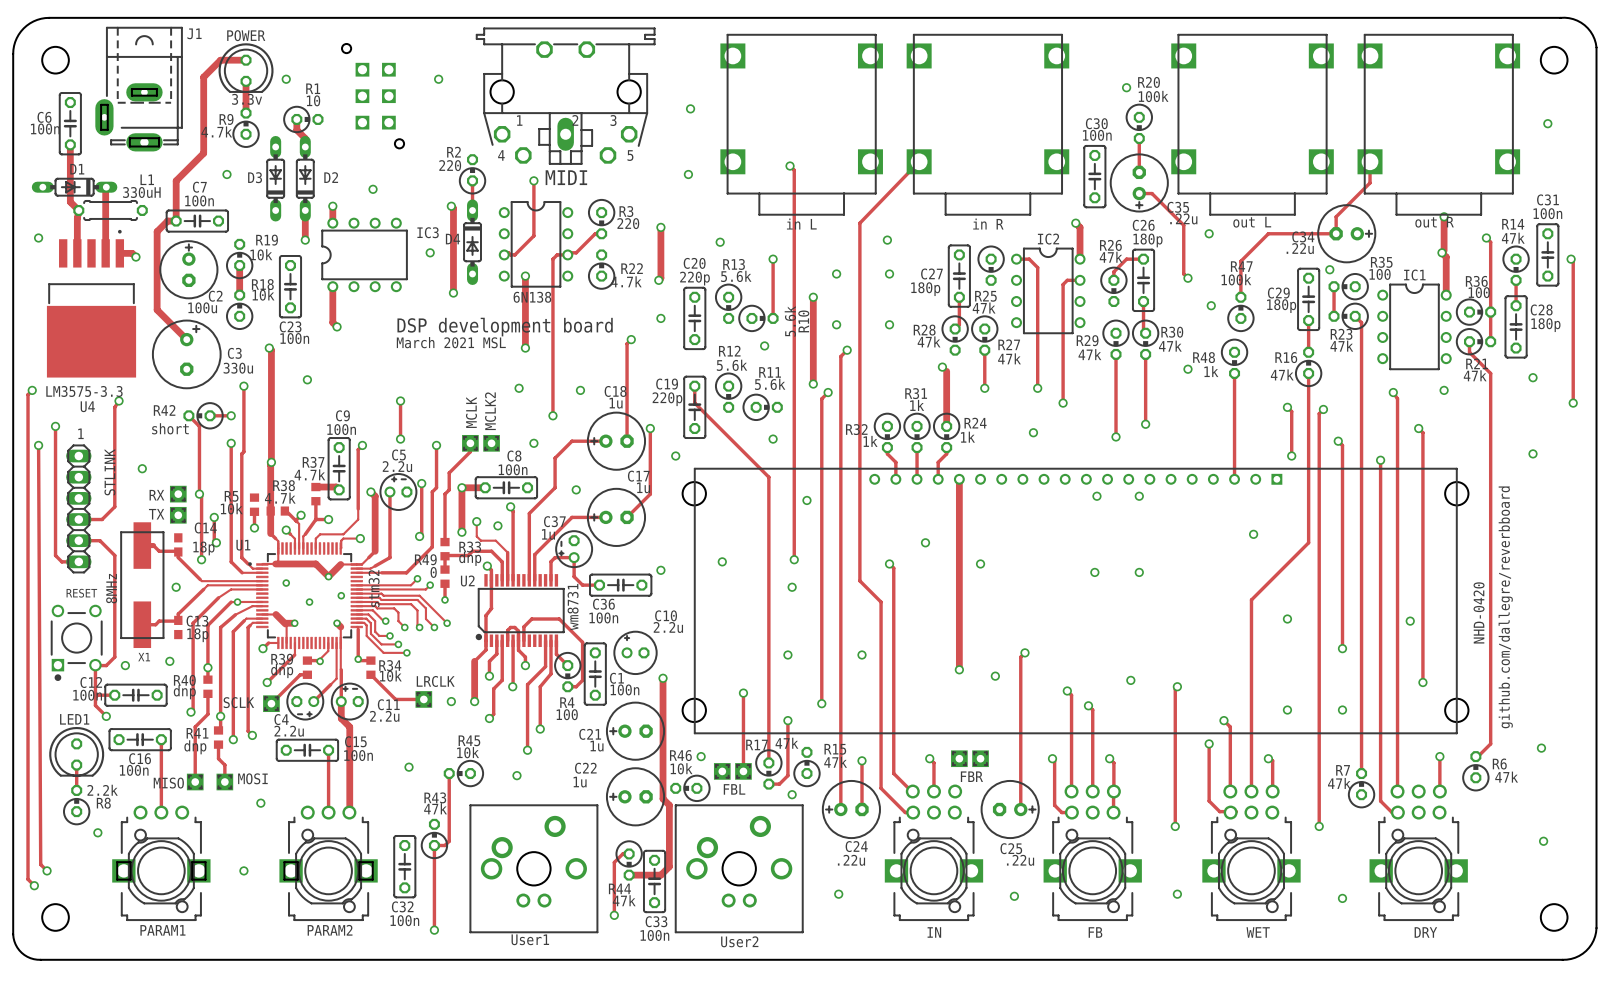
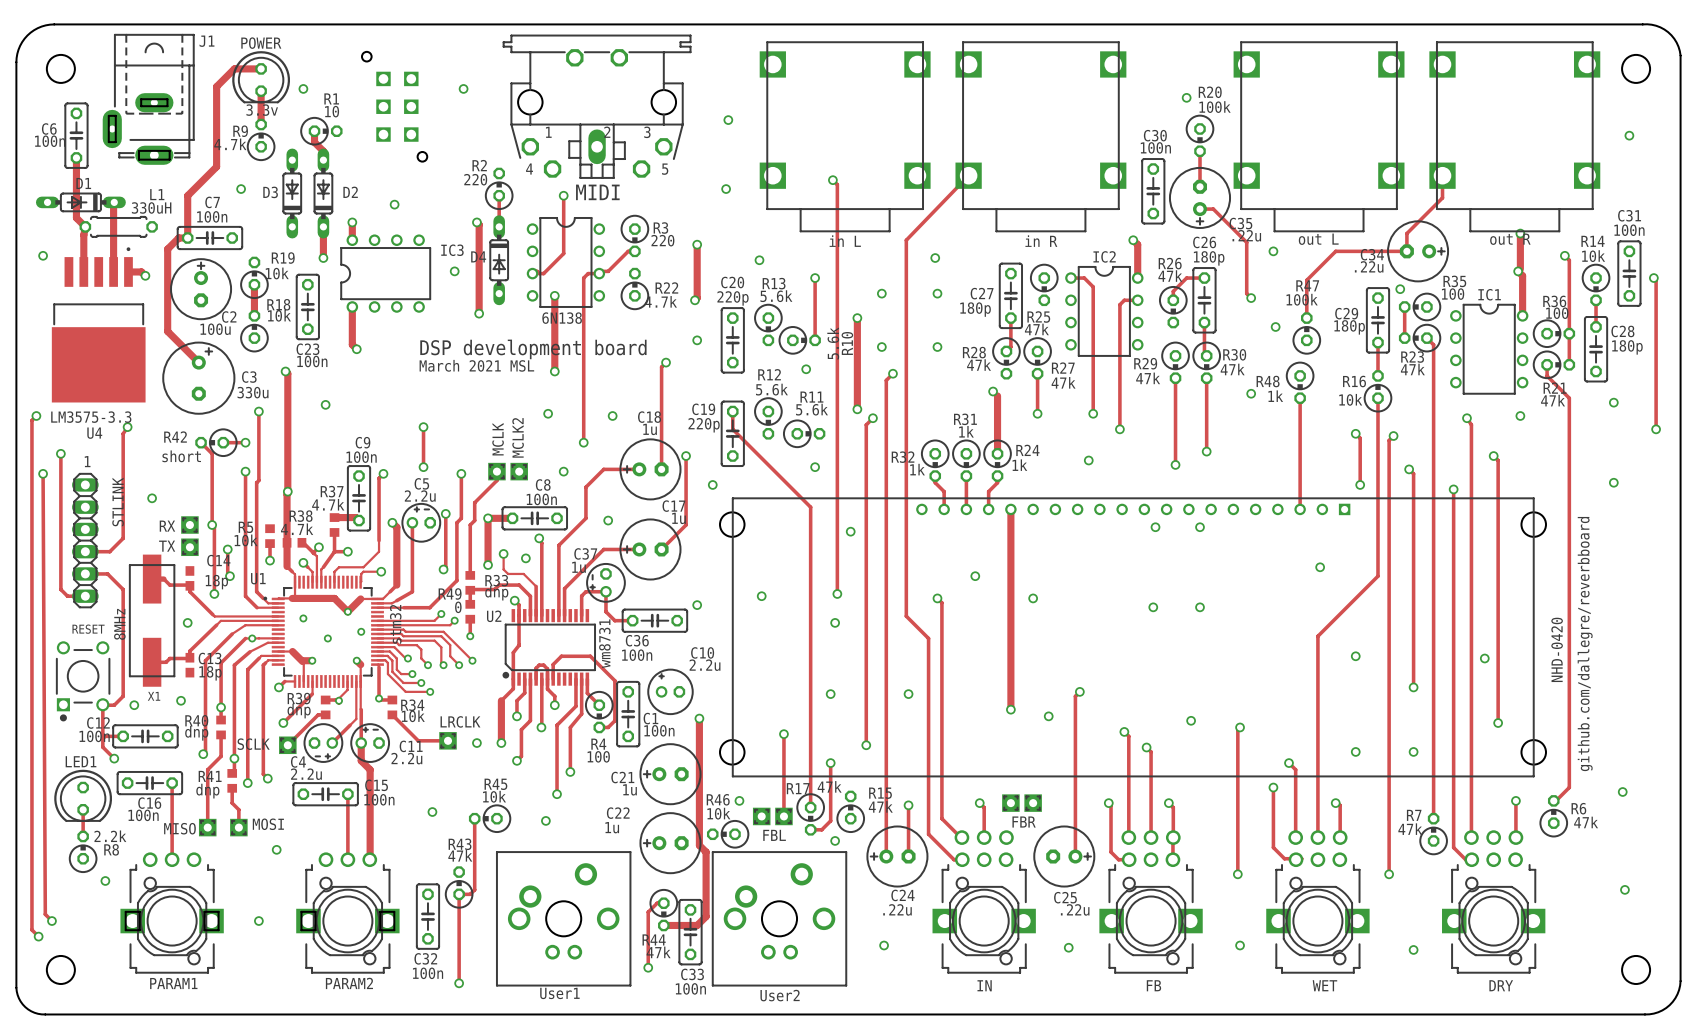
R14 value: 47k (1513, 238) -> 10k (1593, 256)
R16 value: 47k (1282, 374) -> 10k (1350, 399)

